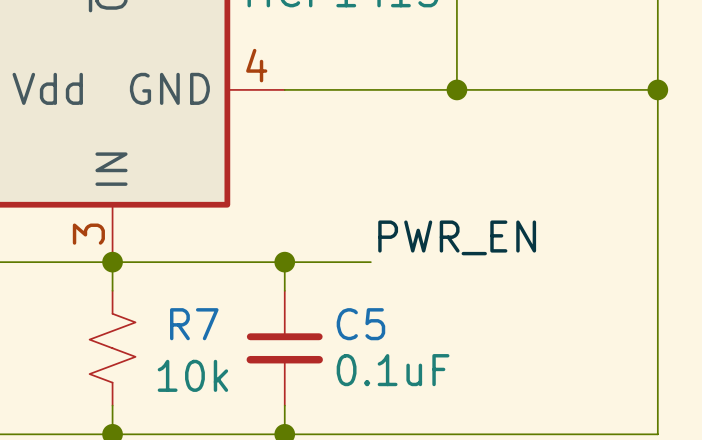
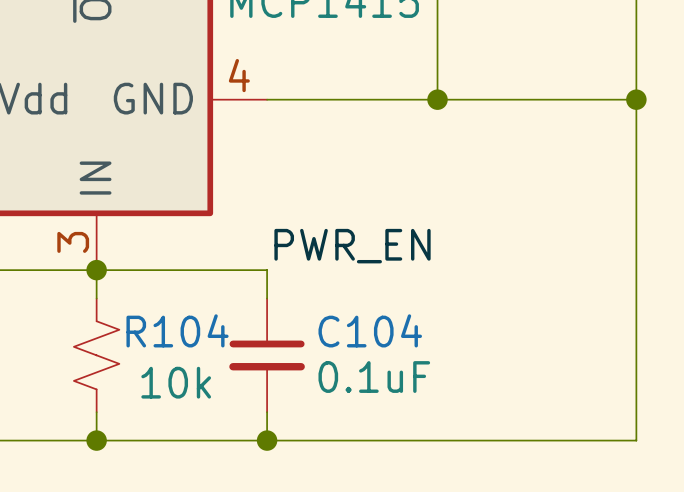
label position: PWR_EN (457, 237) -> PWR_EN (352, 246)
wire: (284, 262) (370, 262) -> none
junction: (284, 262) -> none
R7 name: R7 (194, 324) -> R104 (177, 330)
C5 name: C5 (360, 324) -> C104 (370, 330)

